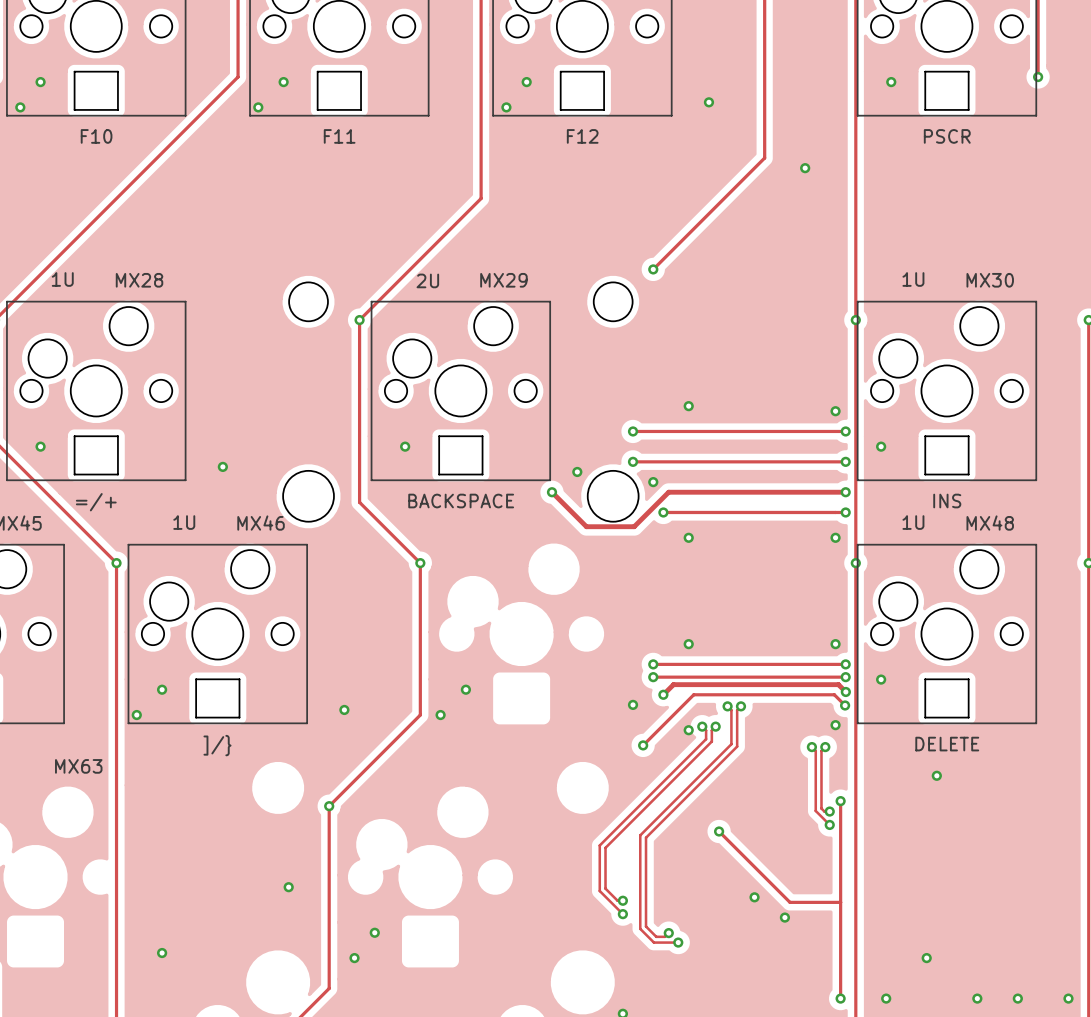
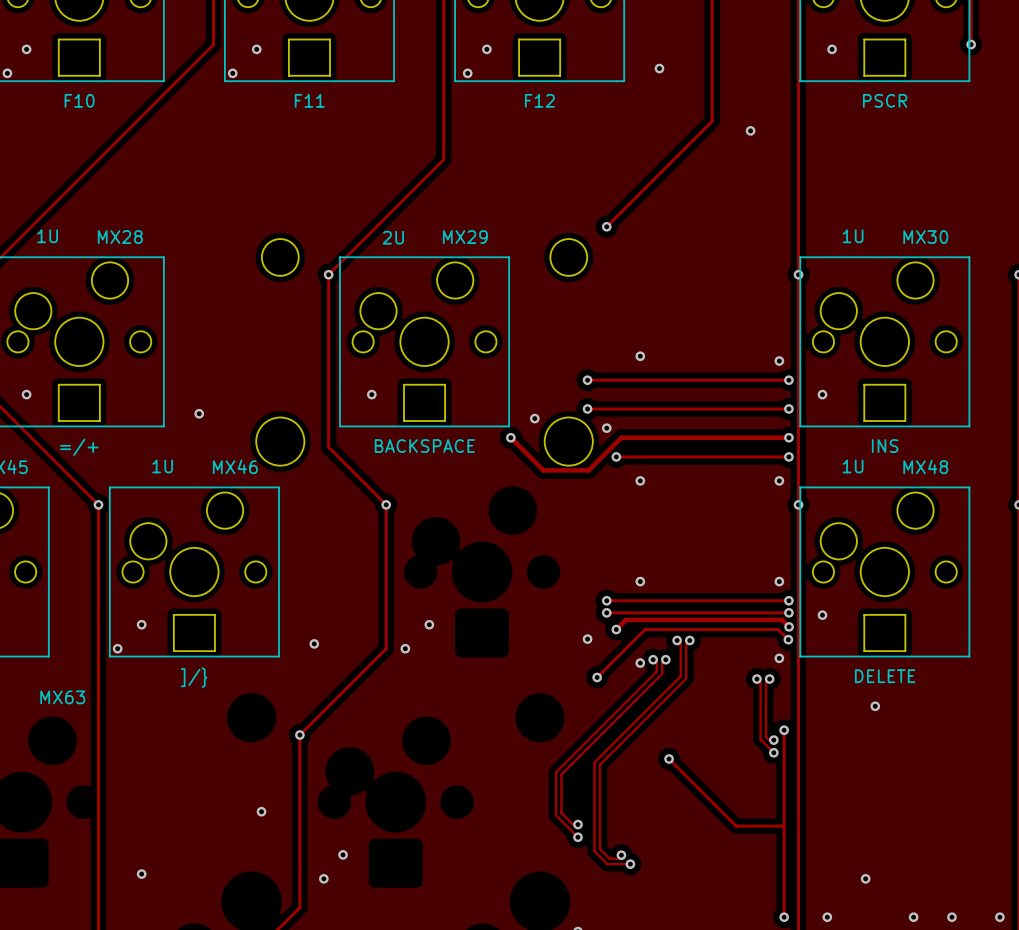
via: (754, 897) -> none
via: (784, 917) -> none

